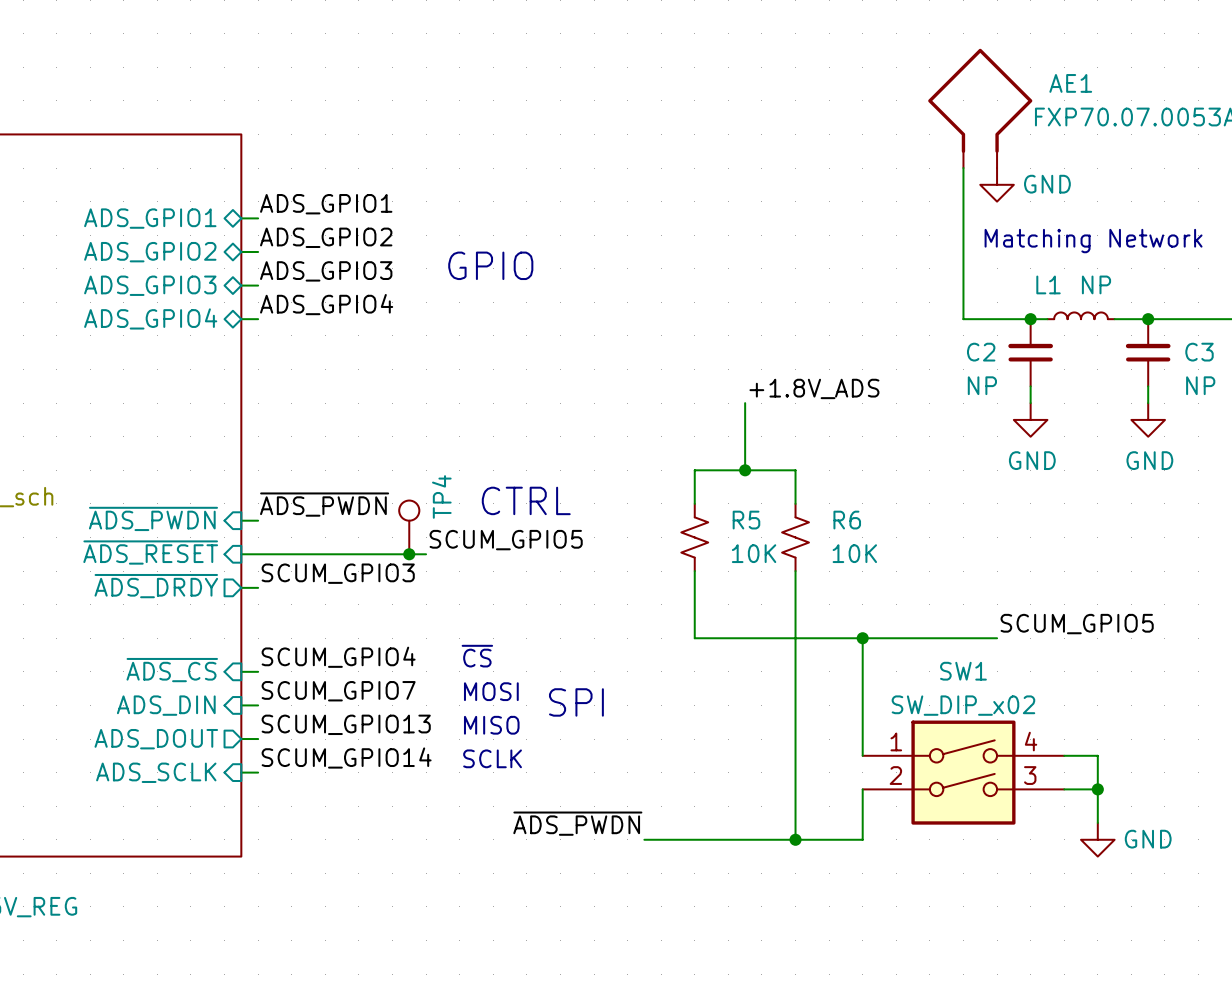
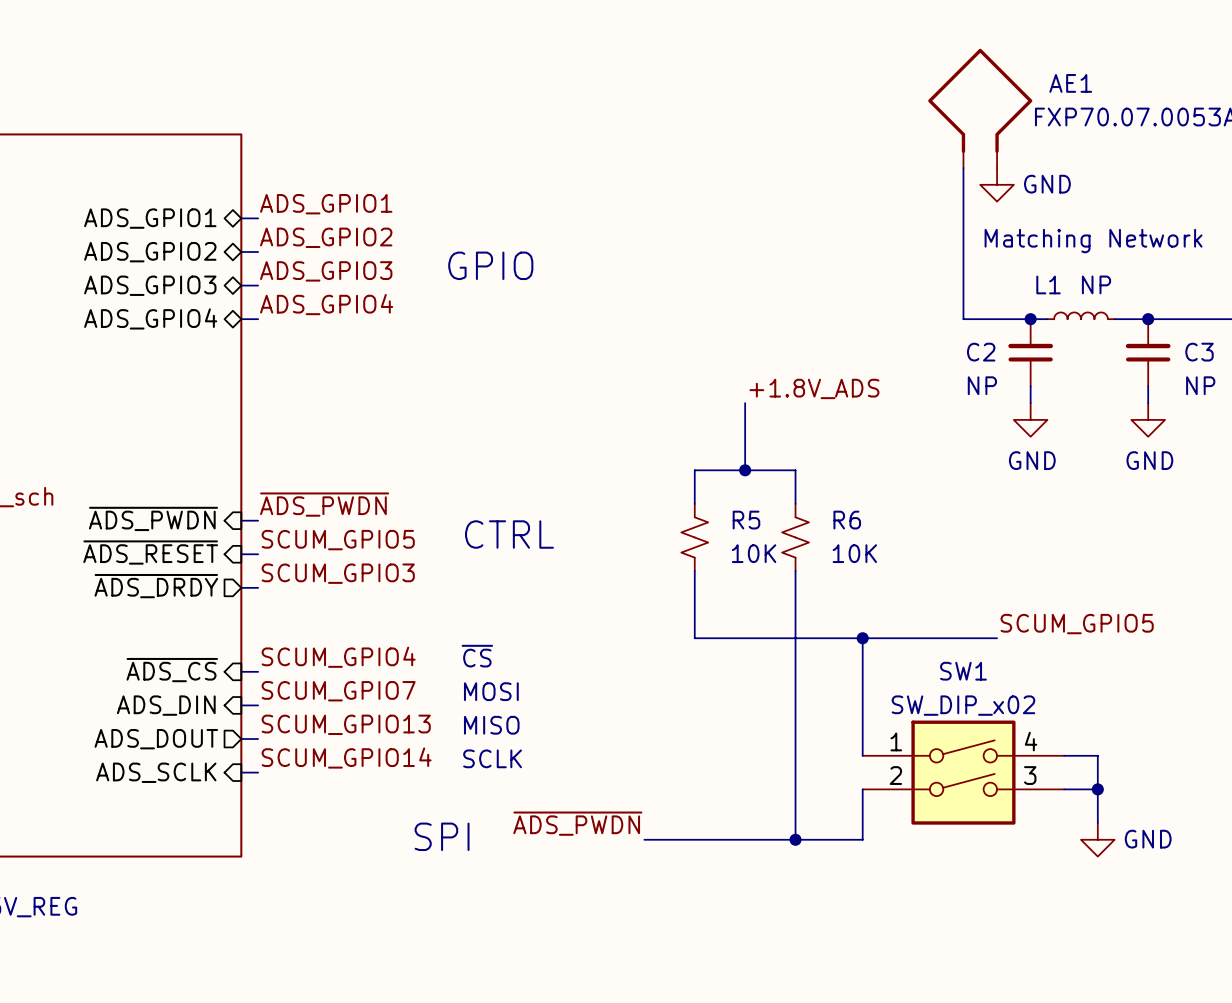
text position: CTRL (526, 500) -> CTRL (509, 534)
TP4: (409, 527) -> none
label position: SCUM_GPIO5 (506, 540) -> SCUM_GPIO5 (338, 540)
wire: (258, 554) (426, 554) -> none
junction: (409, 554) -> none
text position: SPI (576, 702) -> SPI (442, 836)

